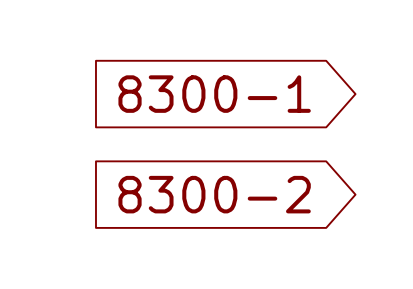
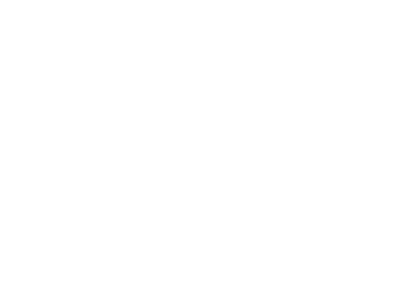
global label: 8300-1 (214, 94) -> none
global label: 8300-2 (214, 194) -> none

